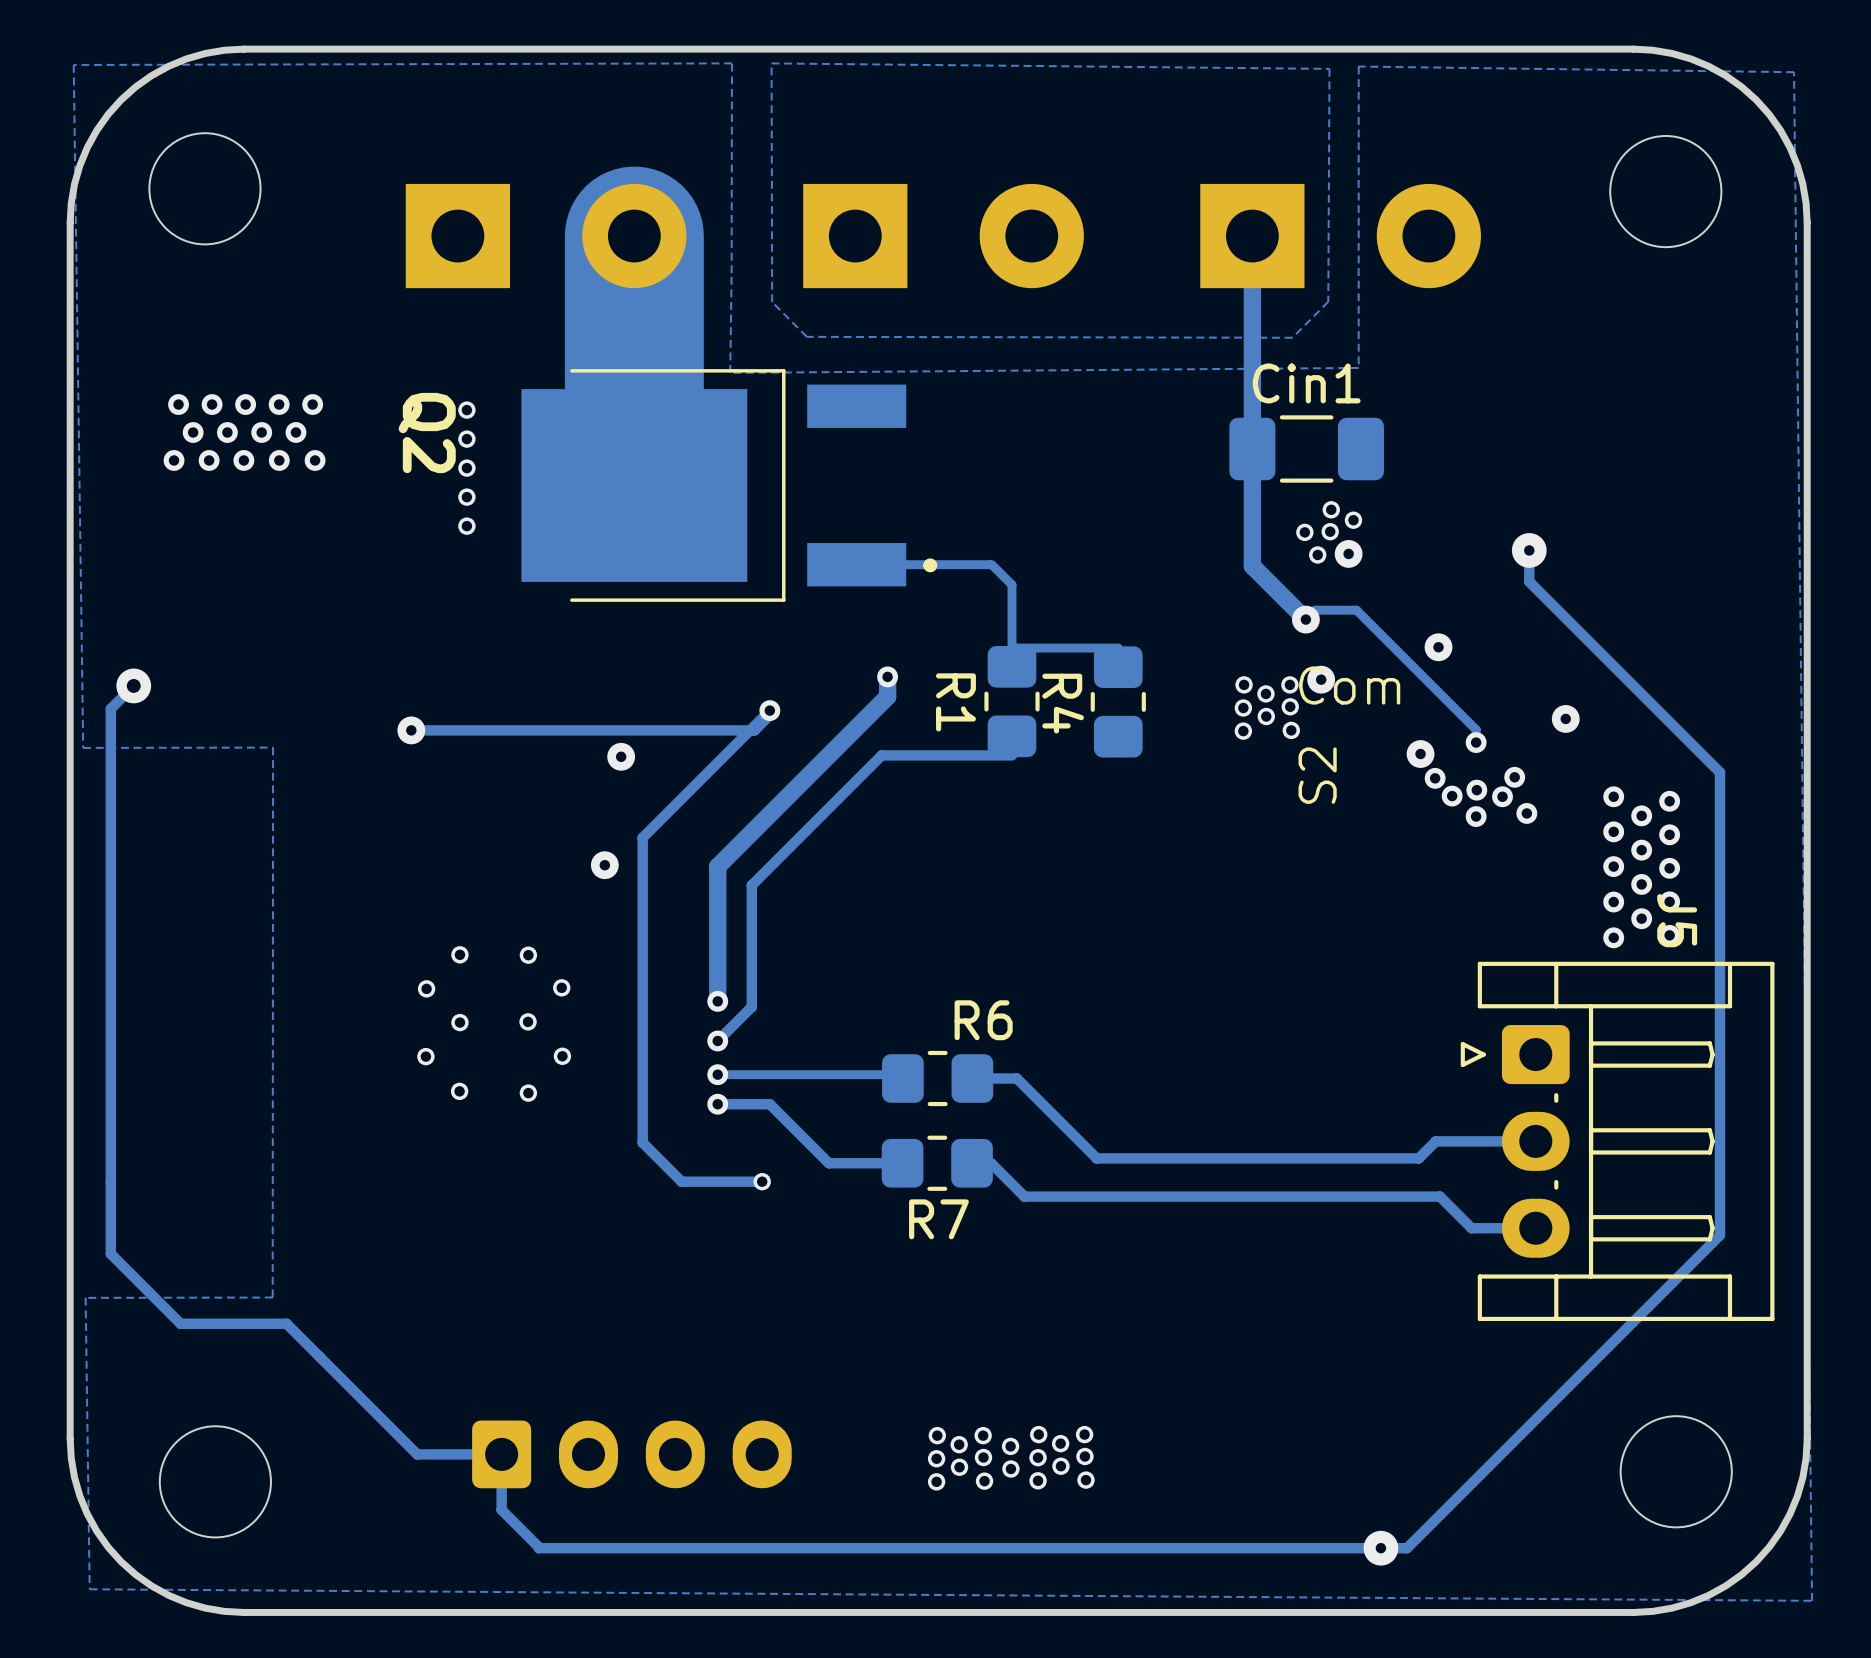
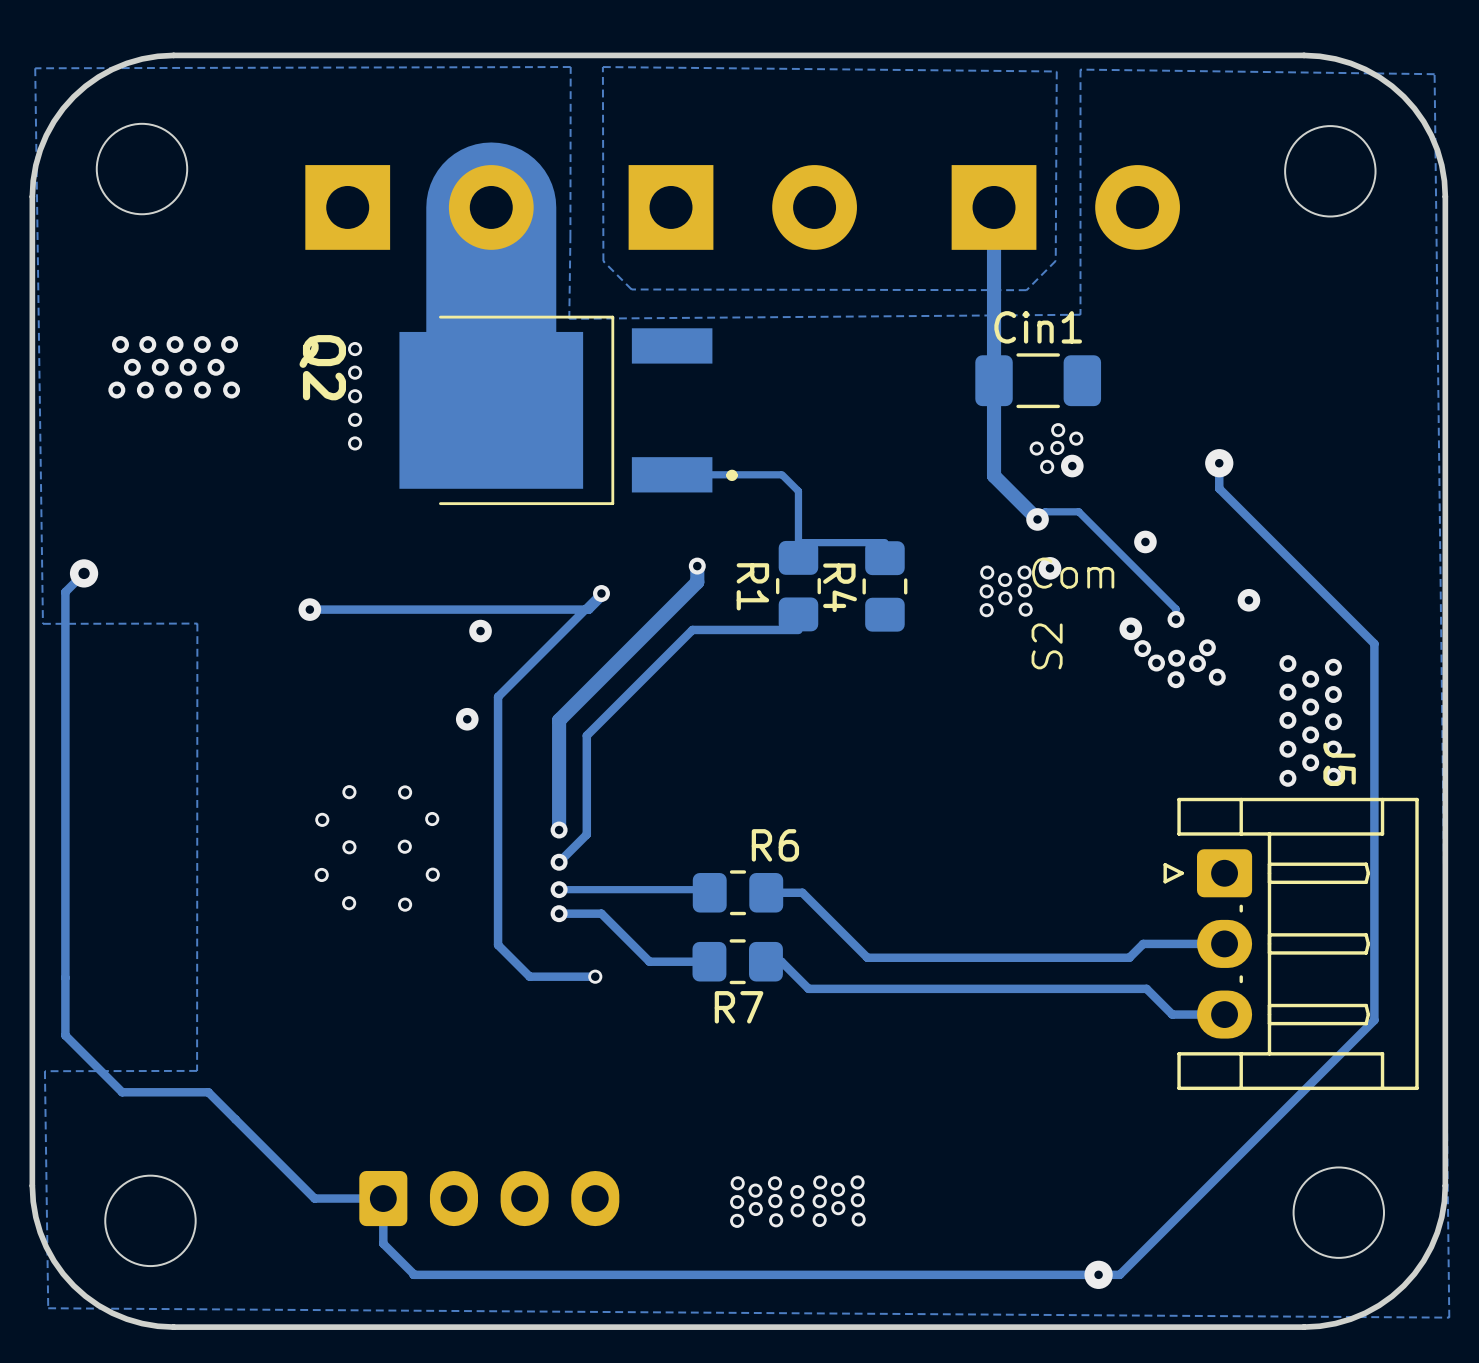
track width: thin (634, 236) (634, 485) -> thick (491, 207) (491, 410)

